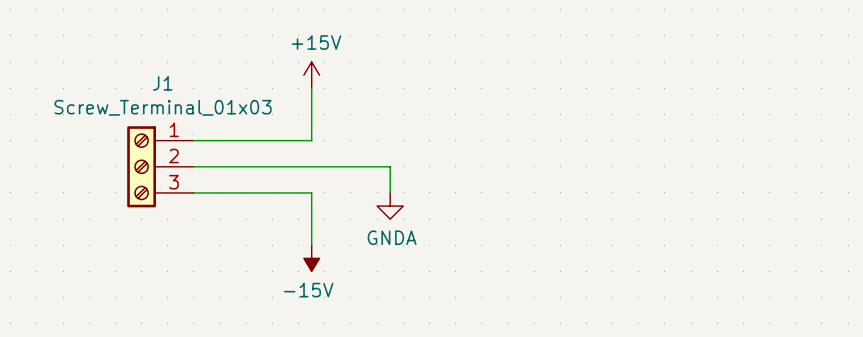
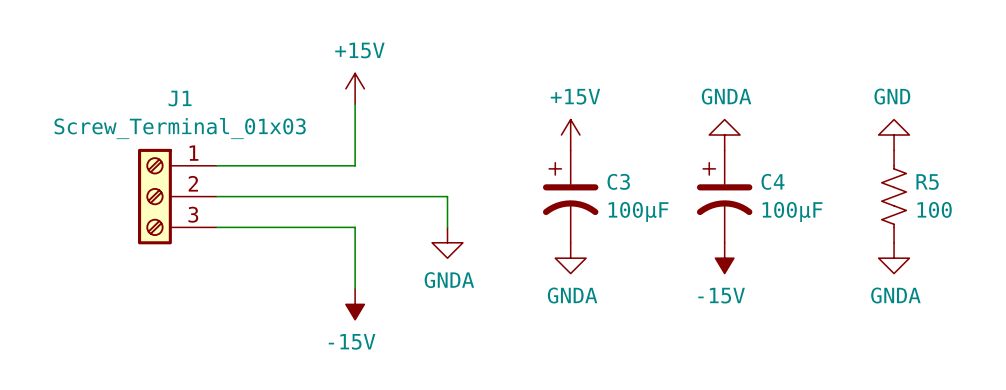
power symbol: none -> +15V (570, 135)
power symbol: none -> GNDA (724, 135)
power symbol: none -> GND (894, 135)
C3: none -> 100µF (570, 196)
C4: none -> 100µF (724, 196)
R5: none -> 100 (894, 196)
power symbol: none -> GNDA (570, 258)
power symbol: none -> -15V (724, 258)
power symbol: none -> GNDA (894, 258)

